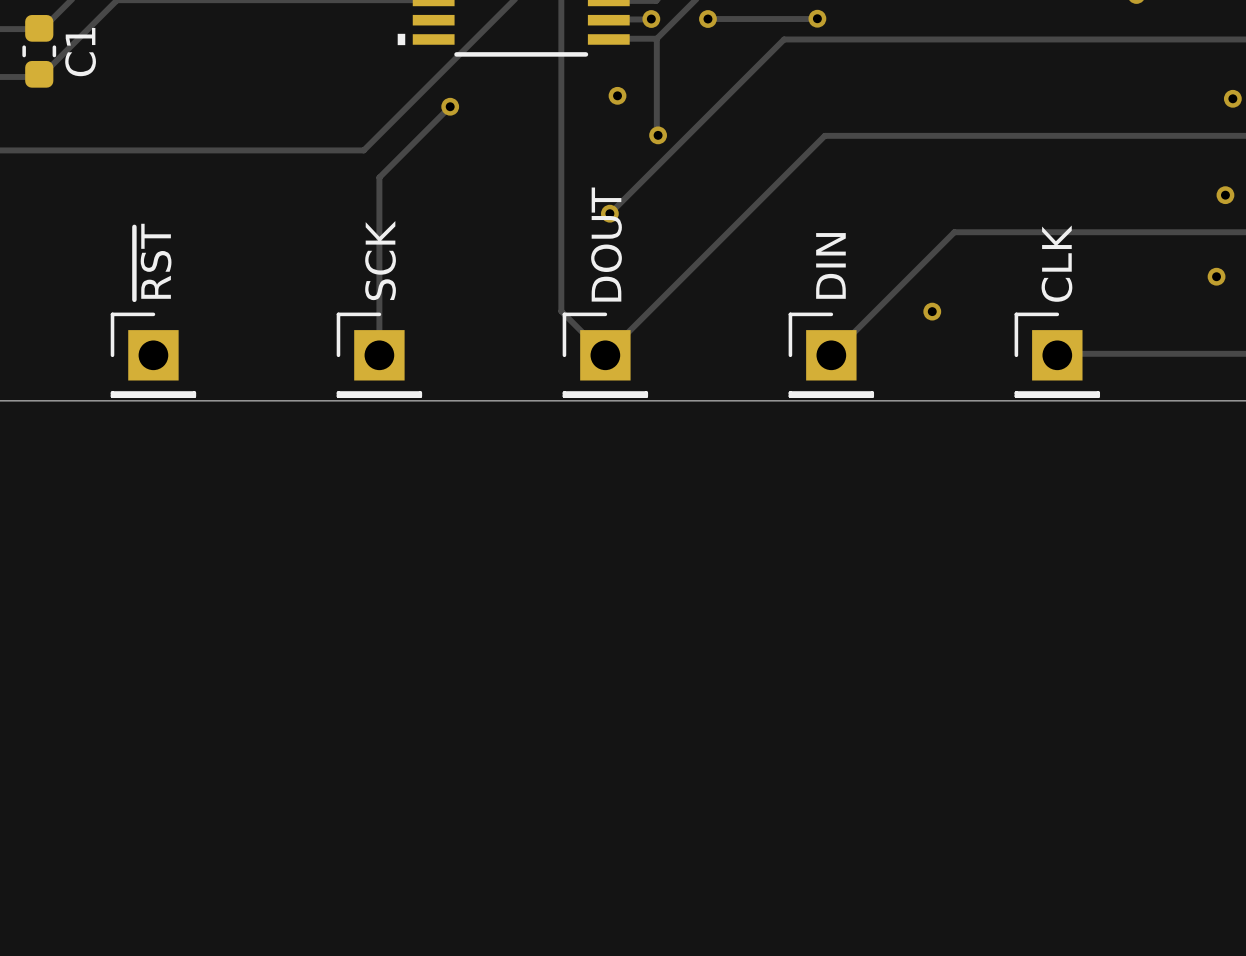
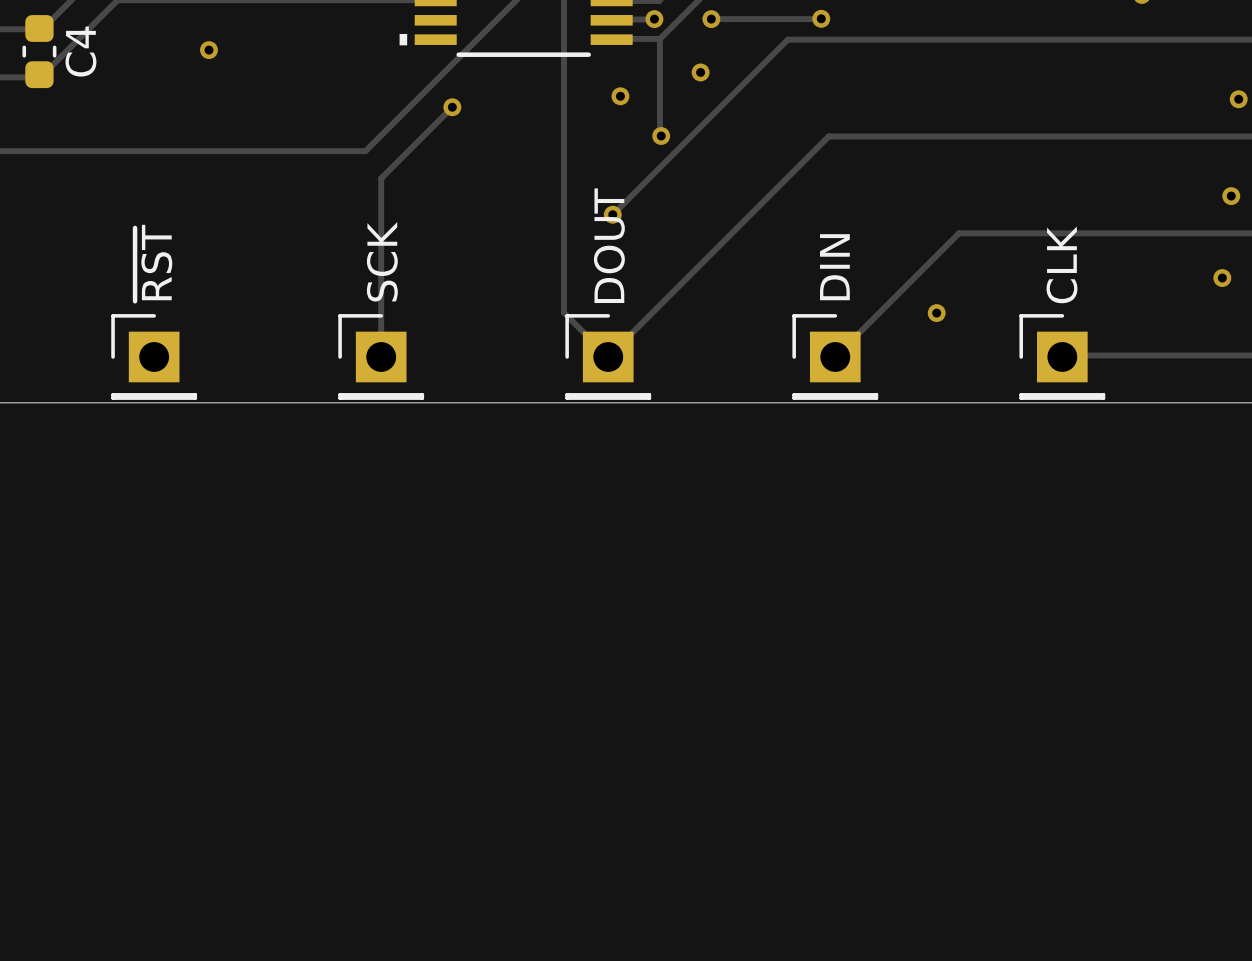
via: none -> (208, 50)
C1 name: C1 (80, 52) -> C4 (80, 51)
via: none -> (700, 72)

